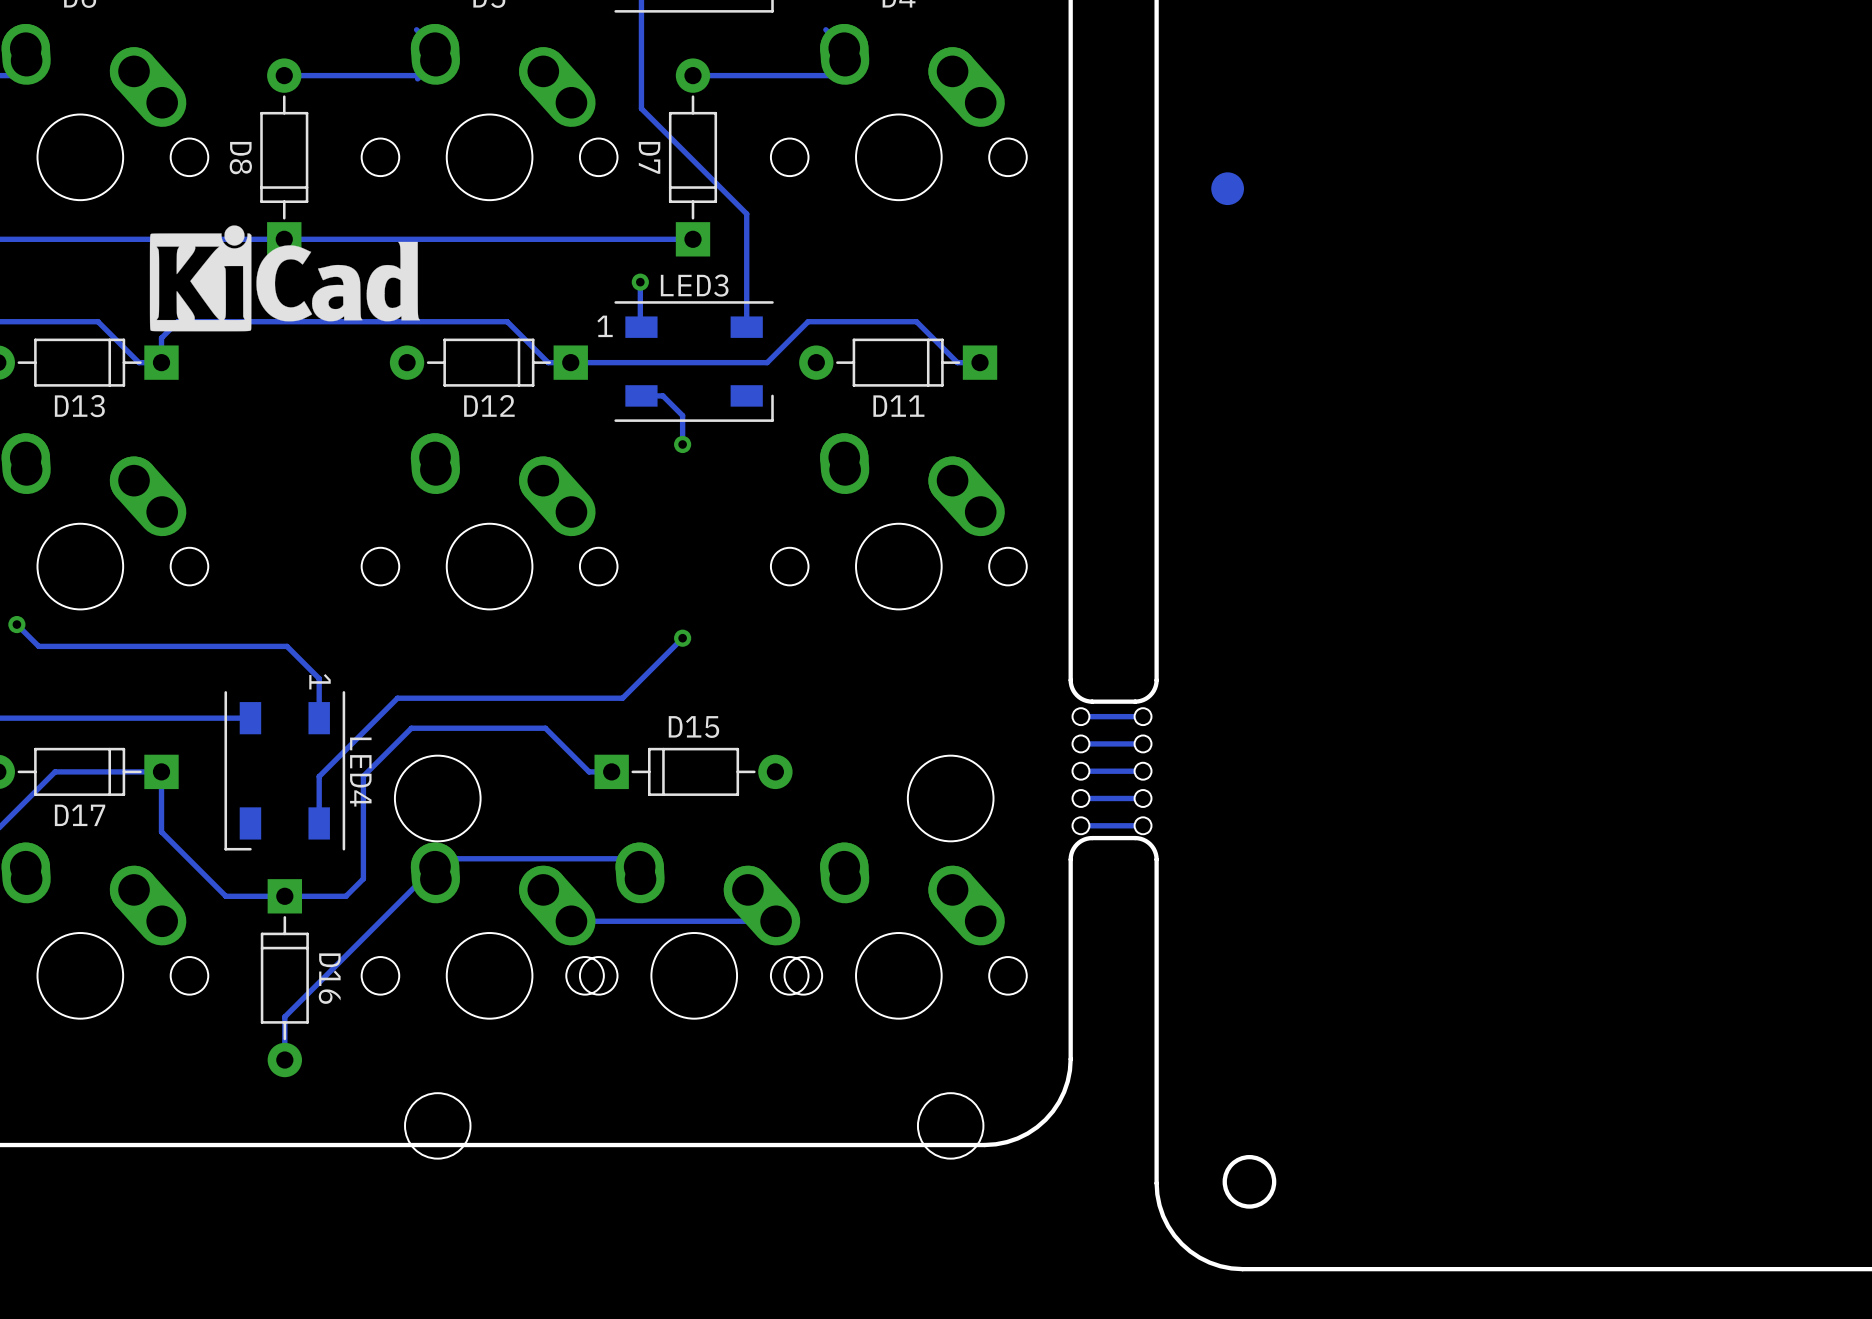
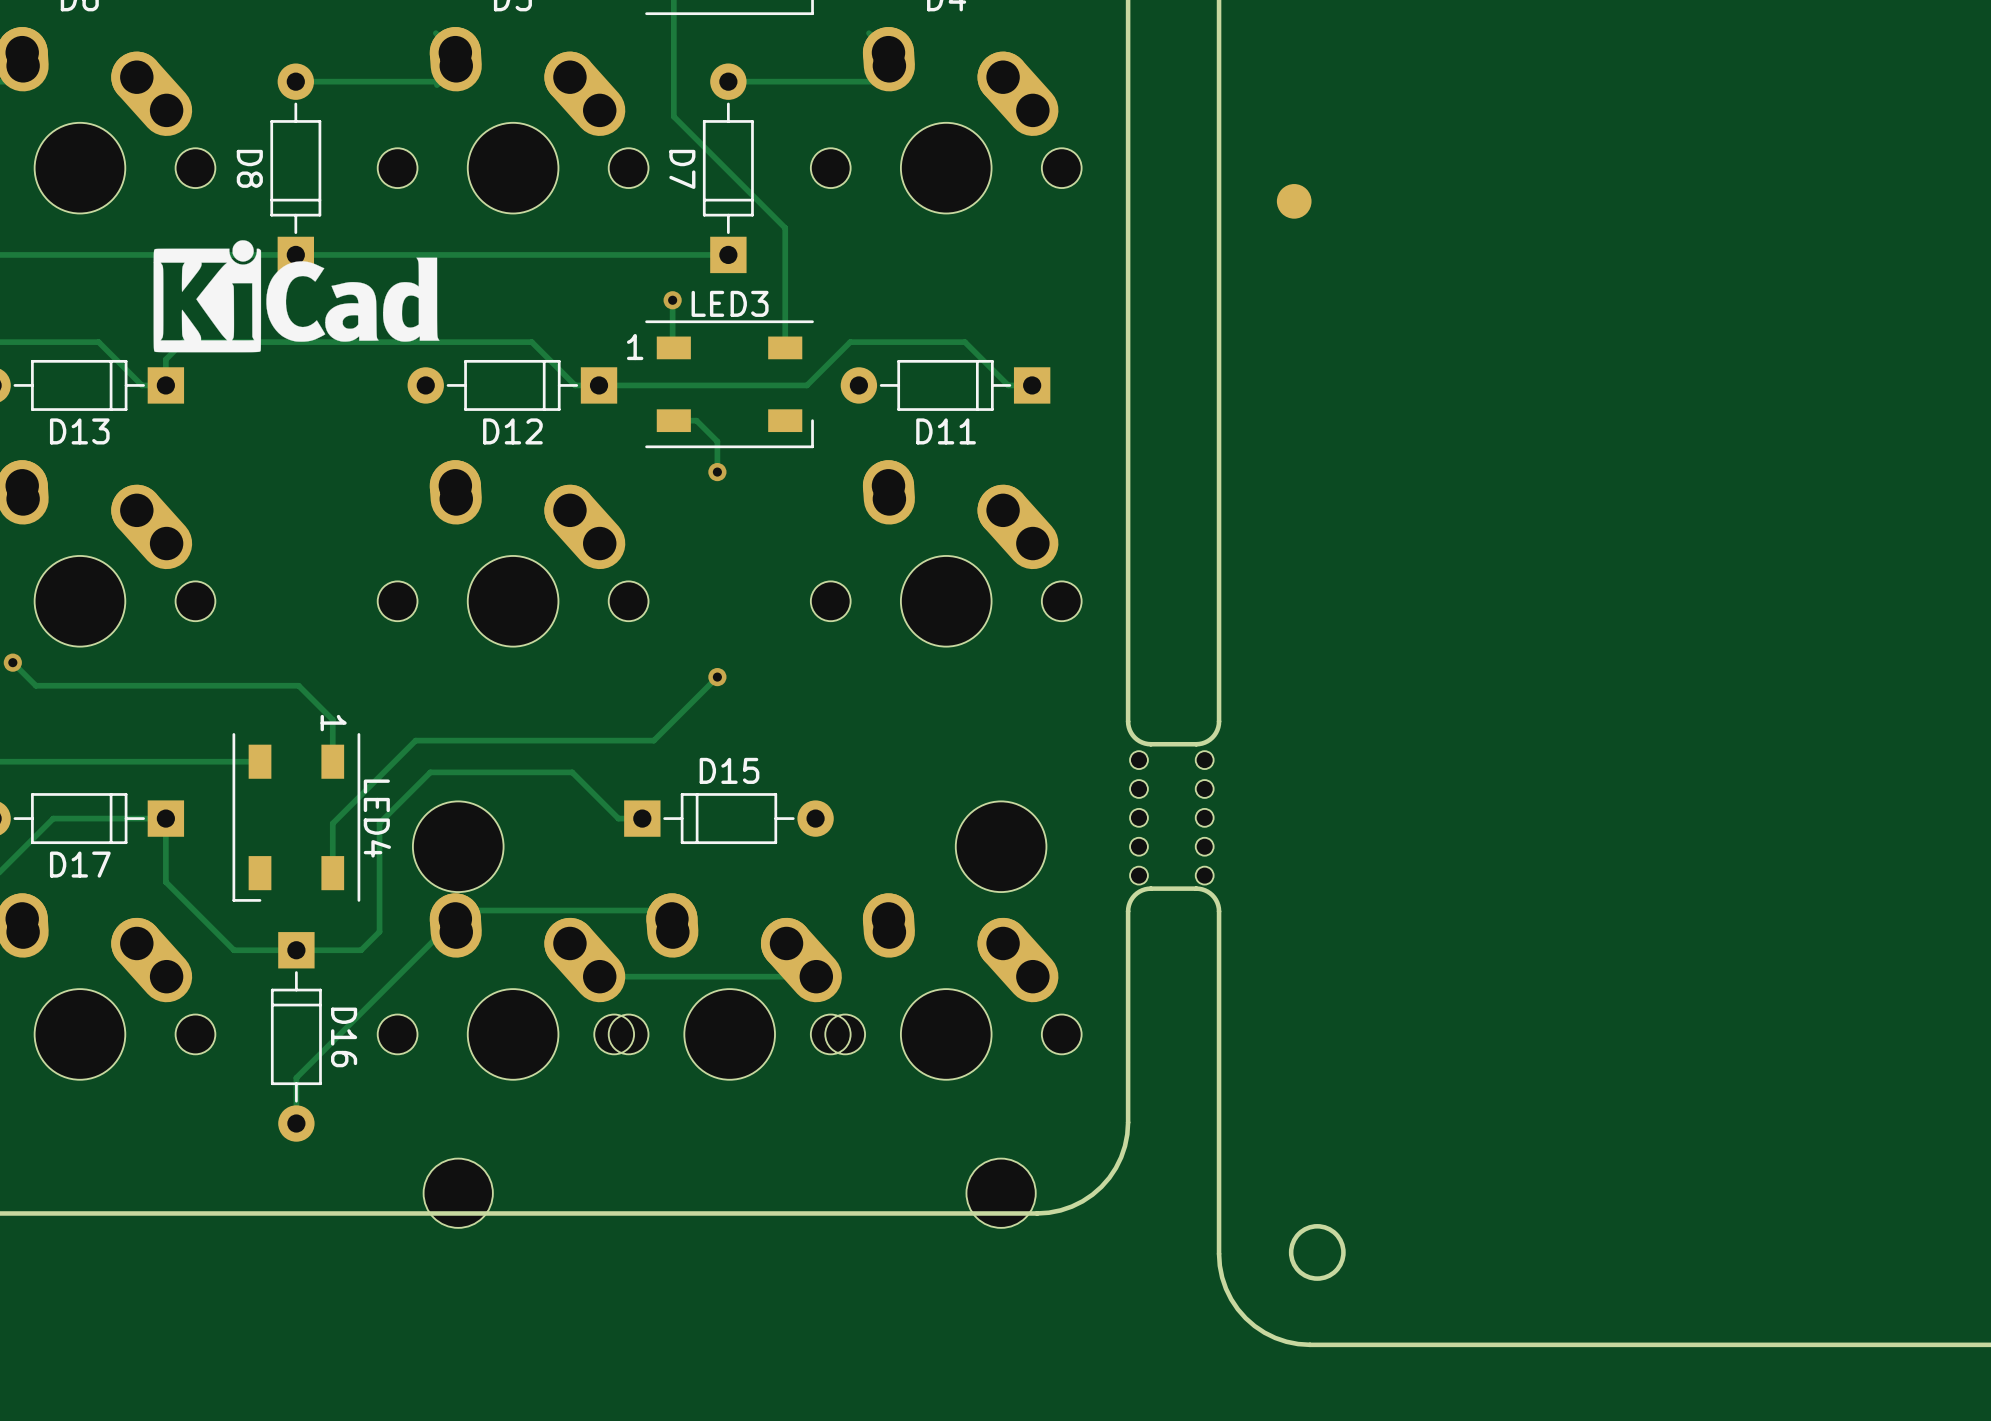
track: (1143, 716) (1080, 716) -> none
track: (1143, 743) (1080, 743) -> none
track: (1143, 771) (1080, 771) -> none
track: (1143, 798) (1080, 798) -> none
track: (1143, 825) (1080, 825) -> none

